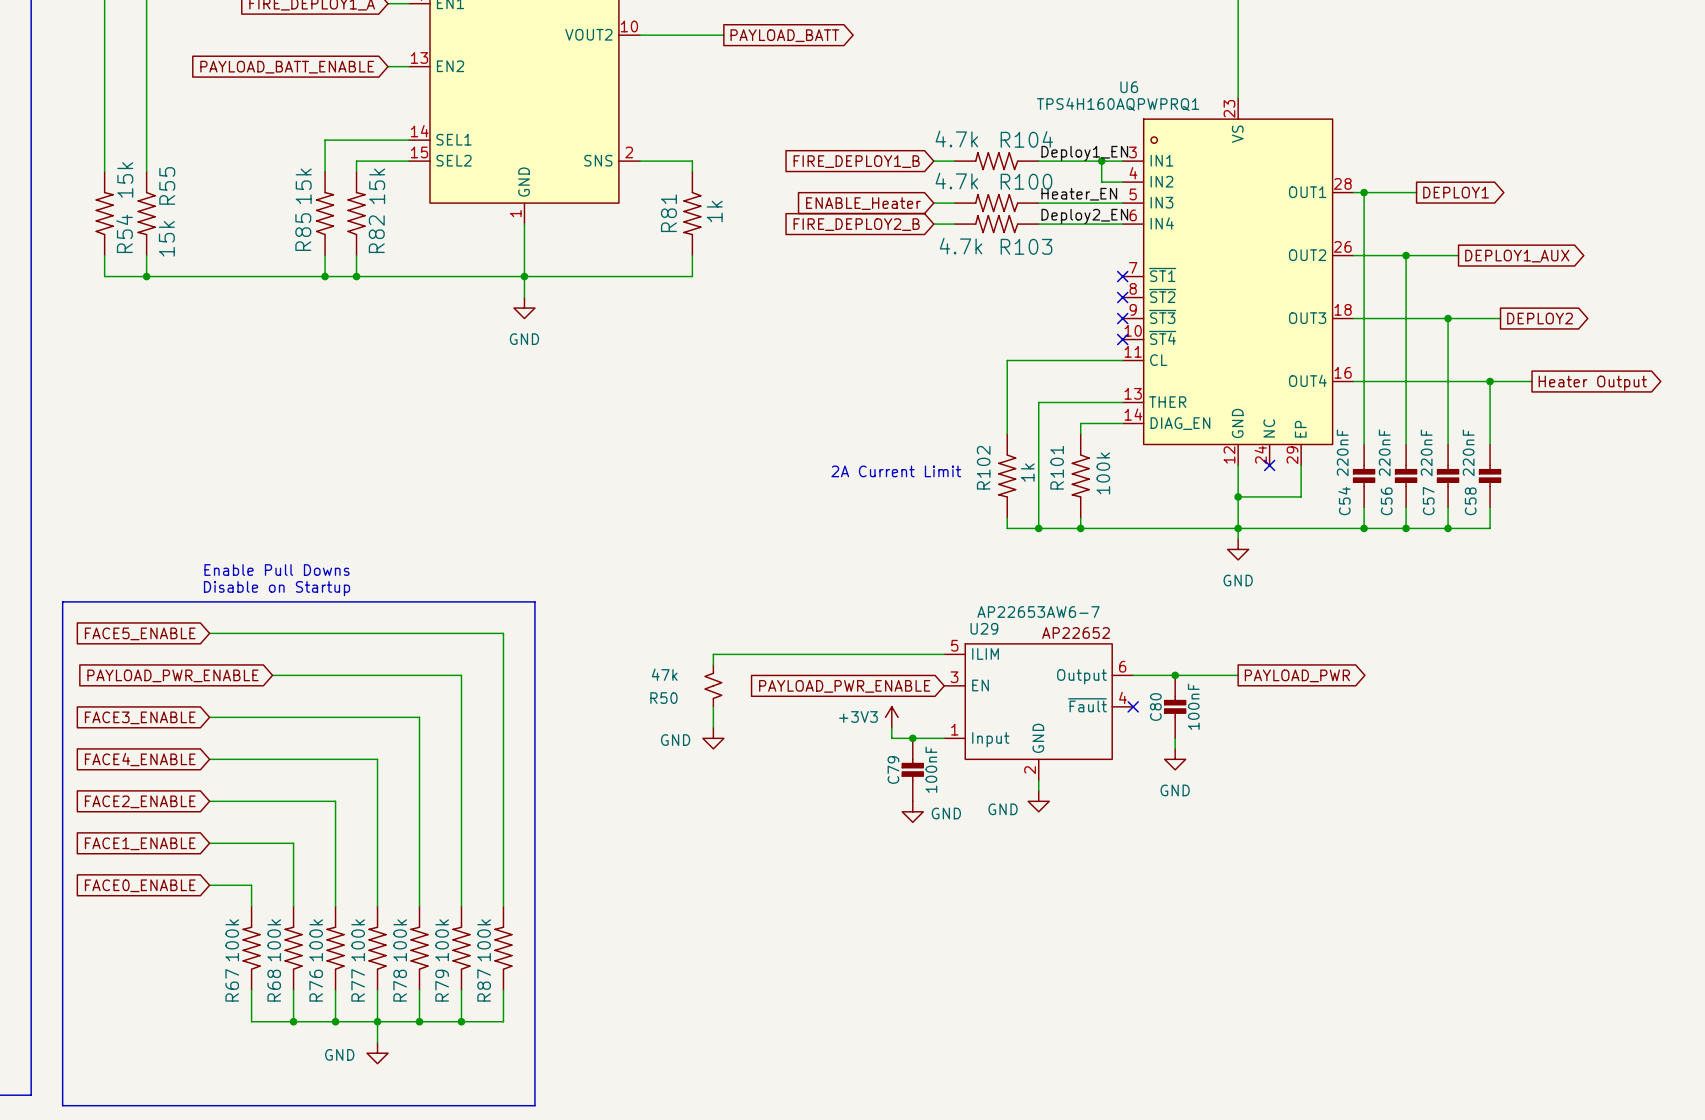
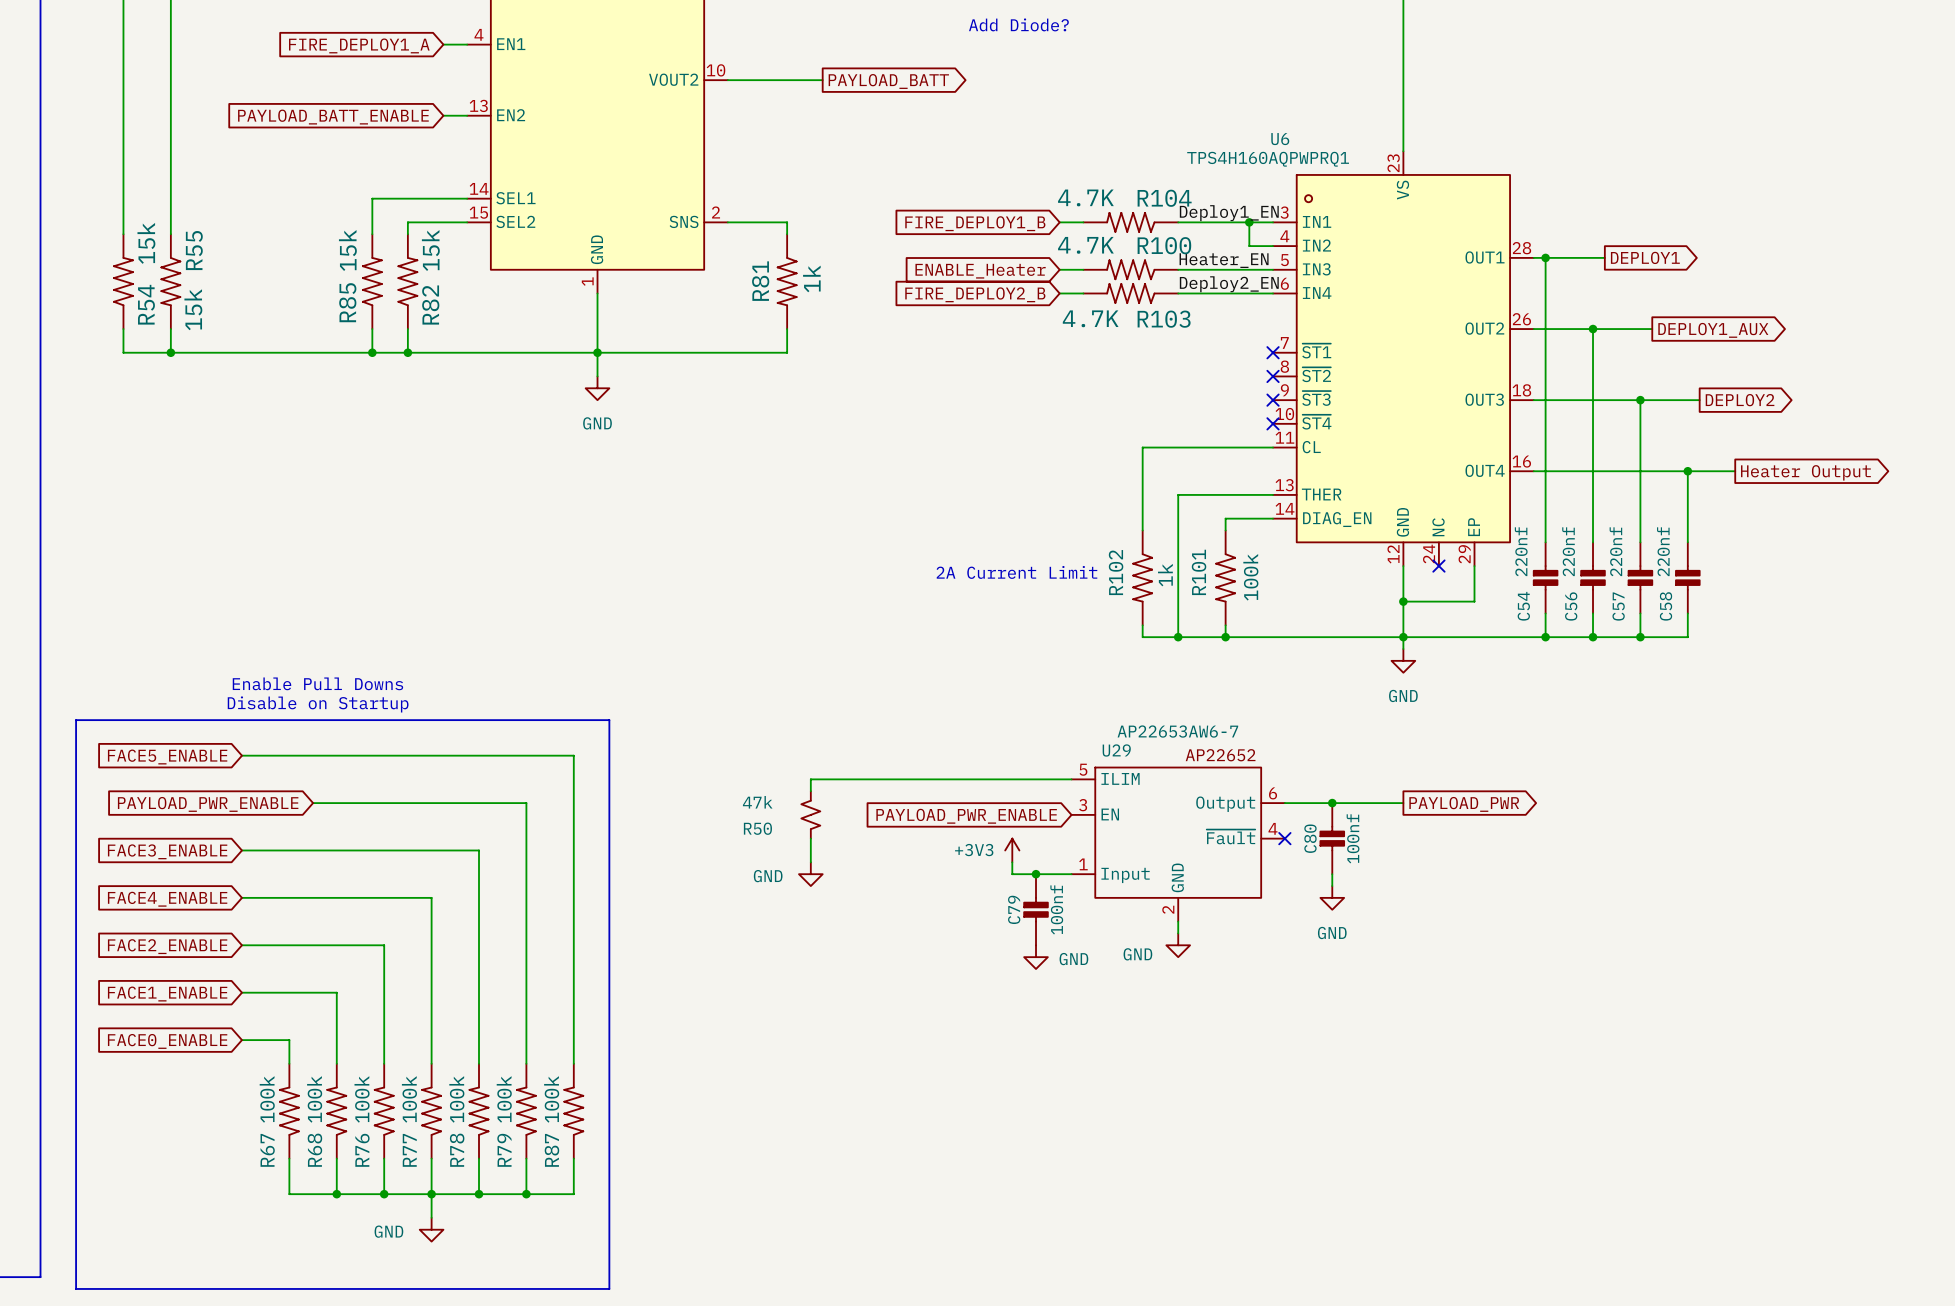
R104 value: 4.7k (956, 139) -> 4.7K (1085, 197)
R100 value: 4.7k (956, 180) -> 4.7K (1085, 245)
R103 value: 4.7k (961, 246) -> 4.7K (1090, 318)
C54 value: 220nF (1342, 452) -> 220nf (1521, 551)
C56 value: 220nF (1384, 452) -> 220nf (1568, 551)
C57 value: 220nF (1426, 452) -> 220nf (1616, 551)
C58 value: 220nF (1468, 452) -> 220nf (1663, 551)
C80 value: 100nF (1193, 706) -> 100nf (1353, 838)
C79 value: 100nF (931, 769) -> 100nf (1056, 909)

